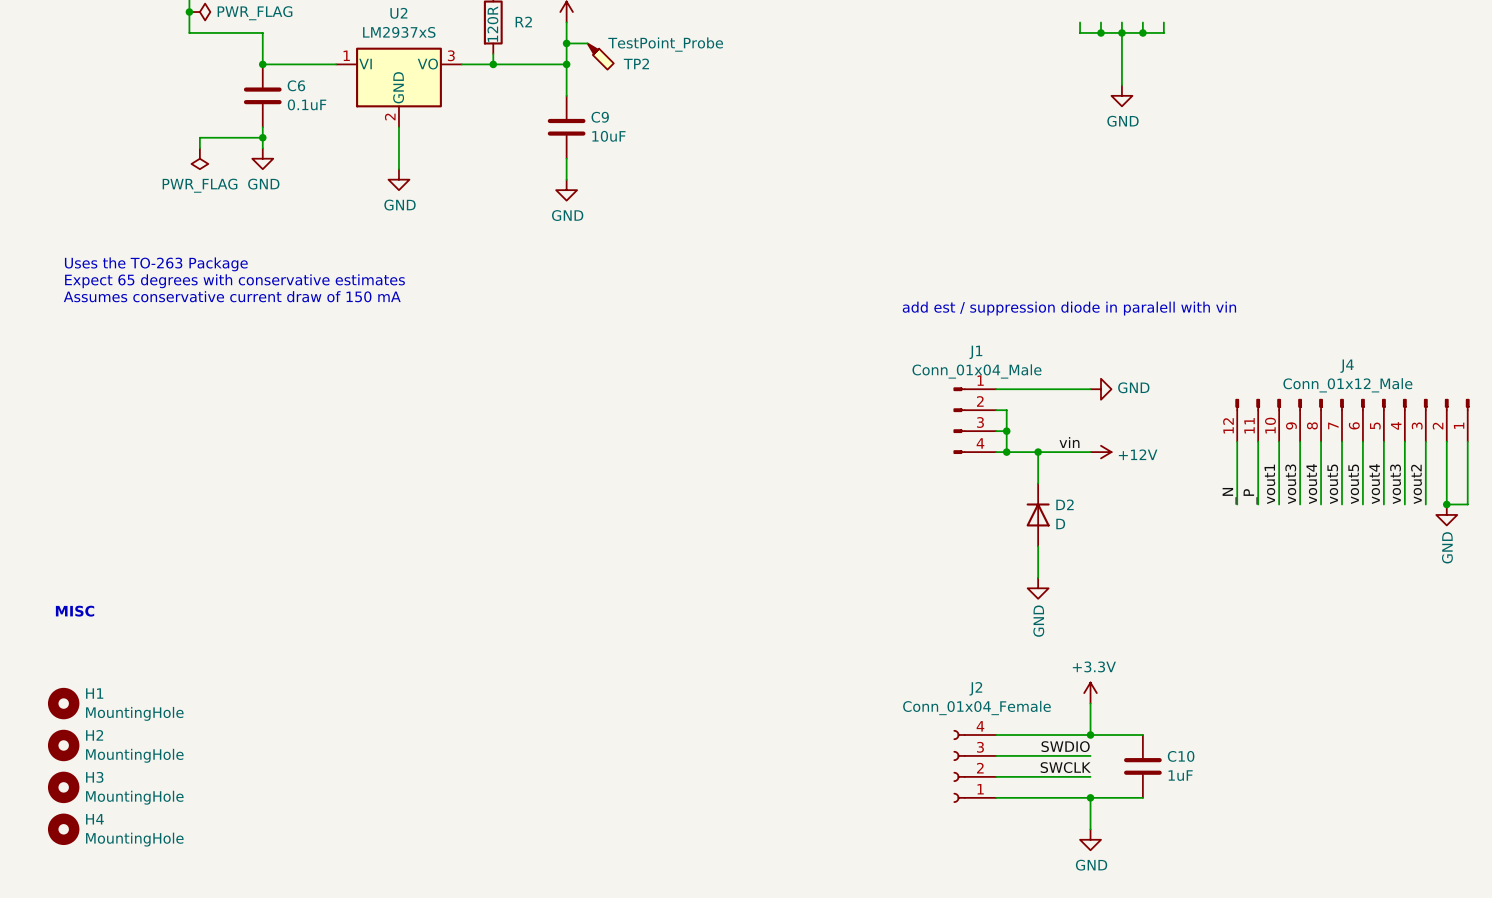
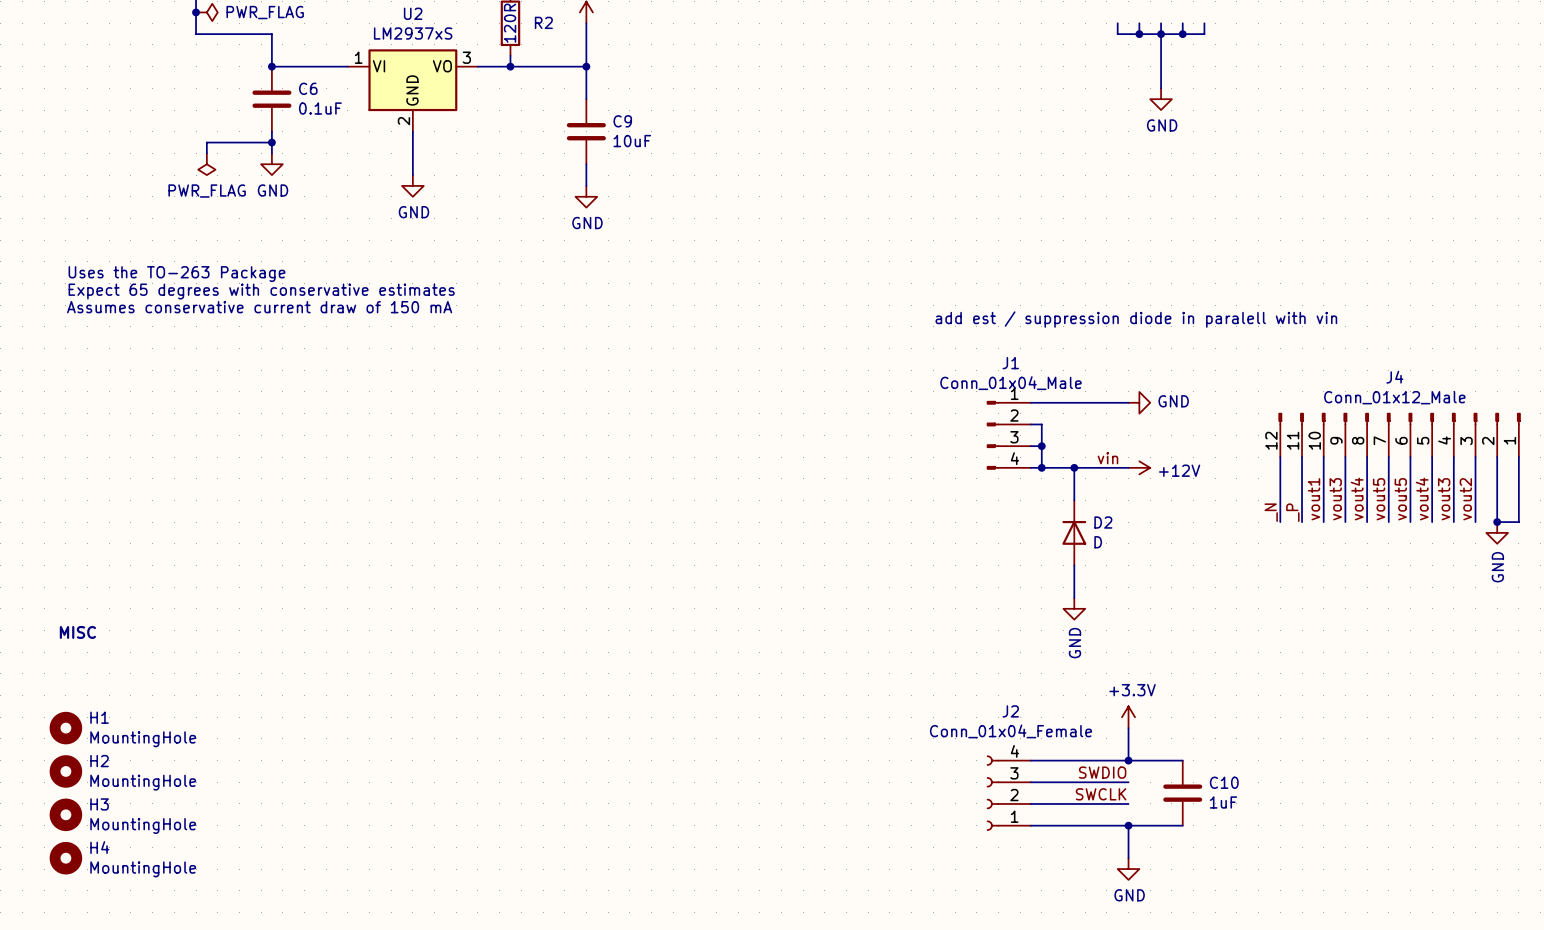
wire: (566, 43) (587, 43) -> none
junction: (566, 43) -> none
TP2: TestPoint_Probe (600, 56) -> none

